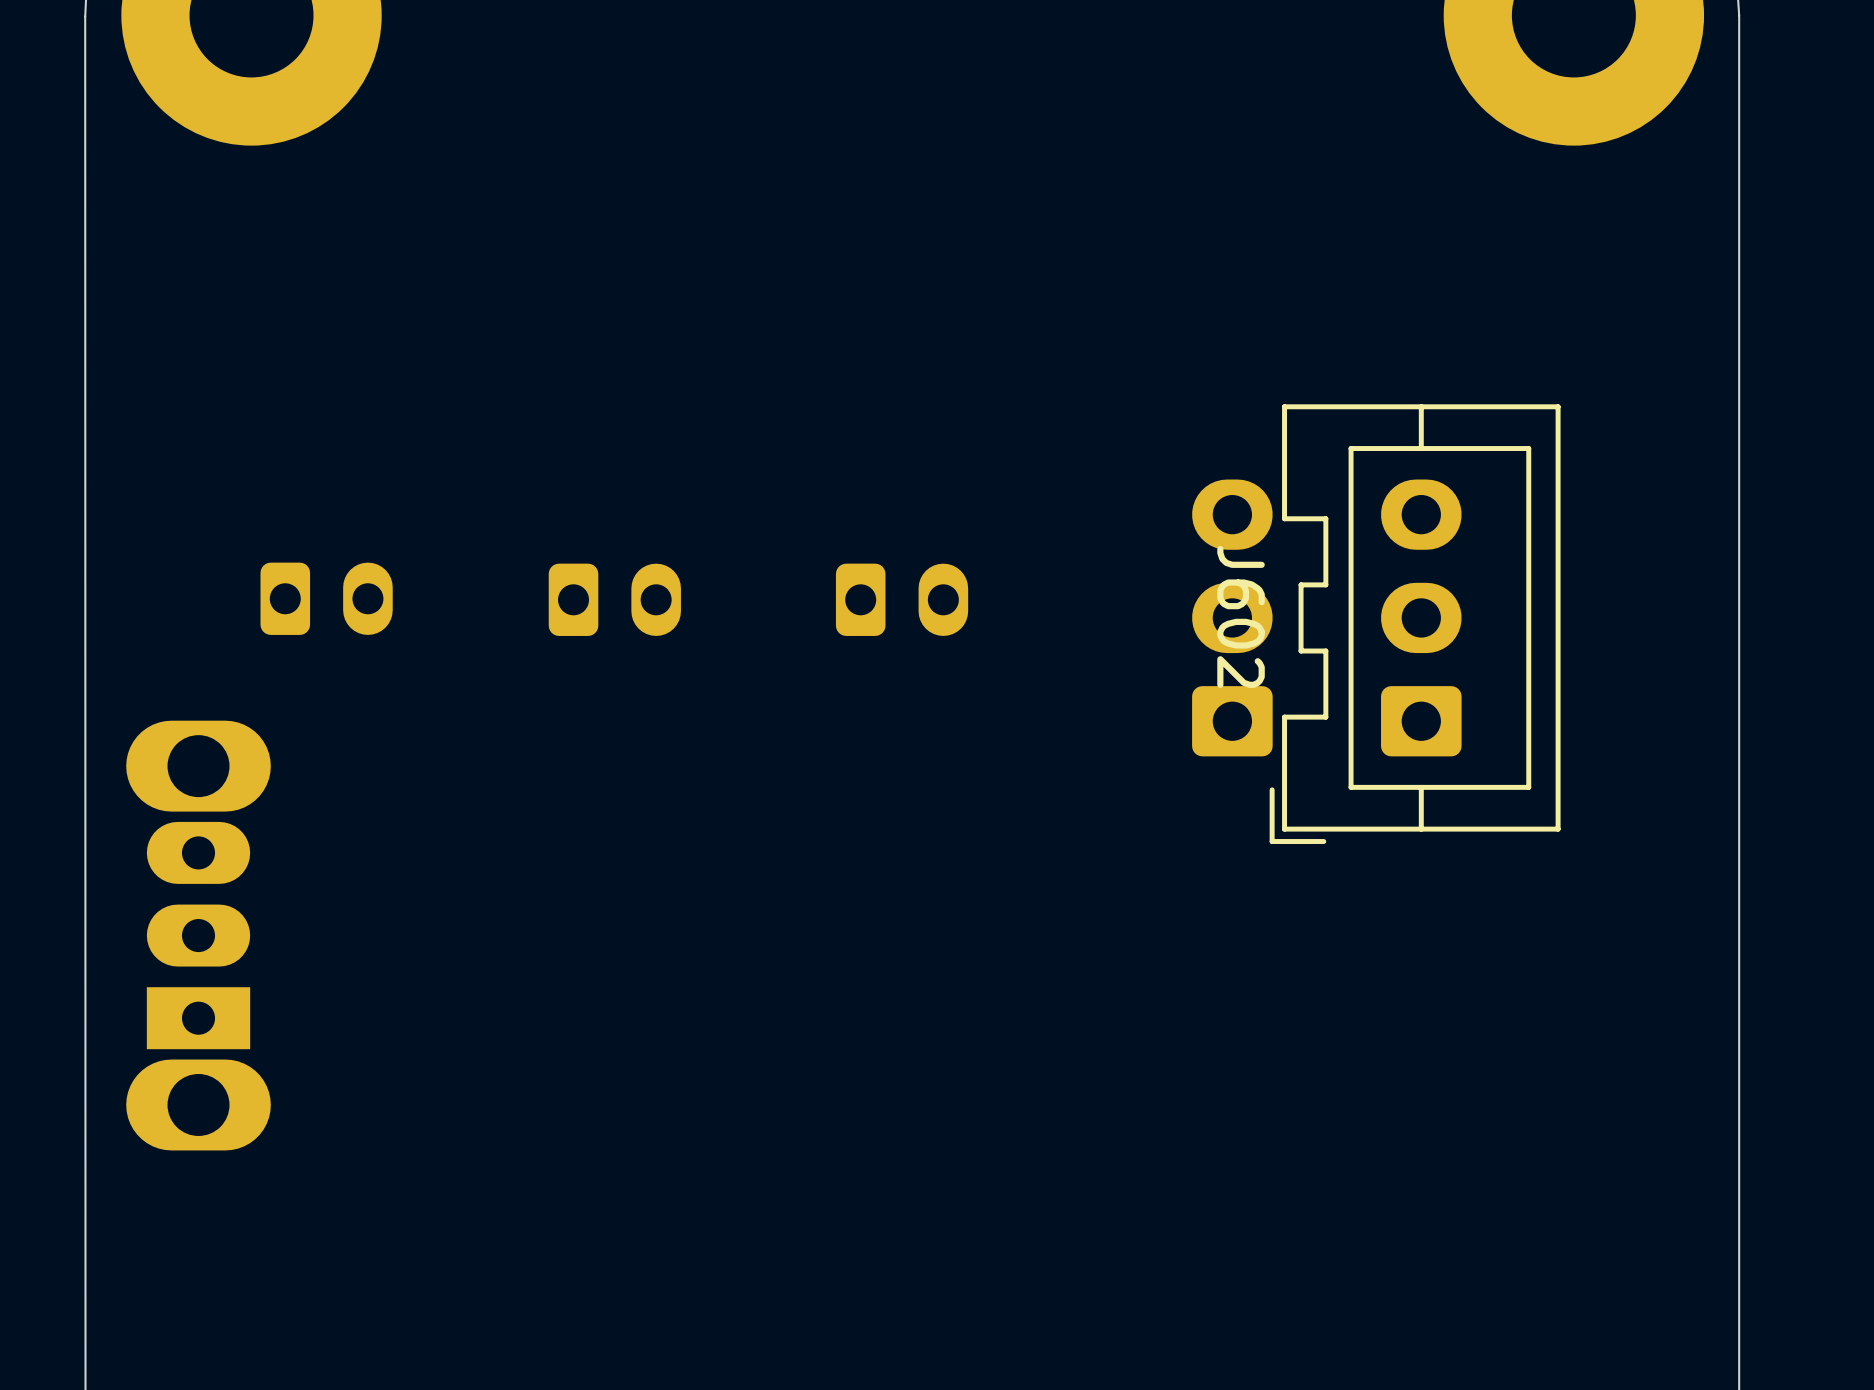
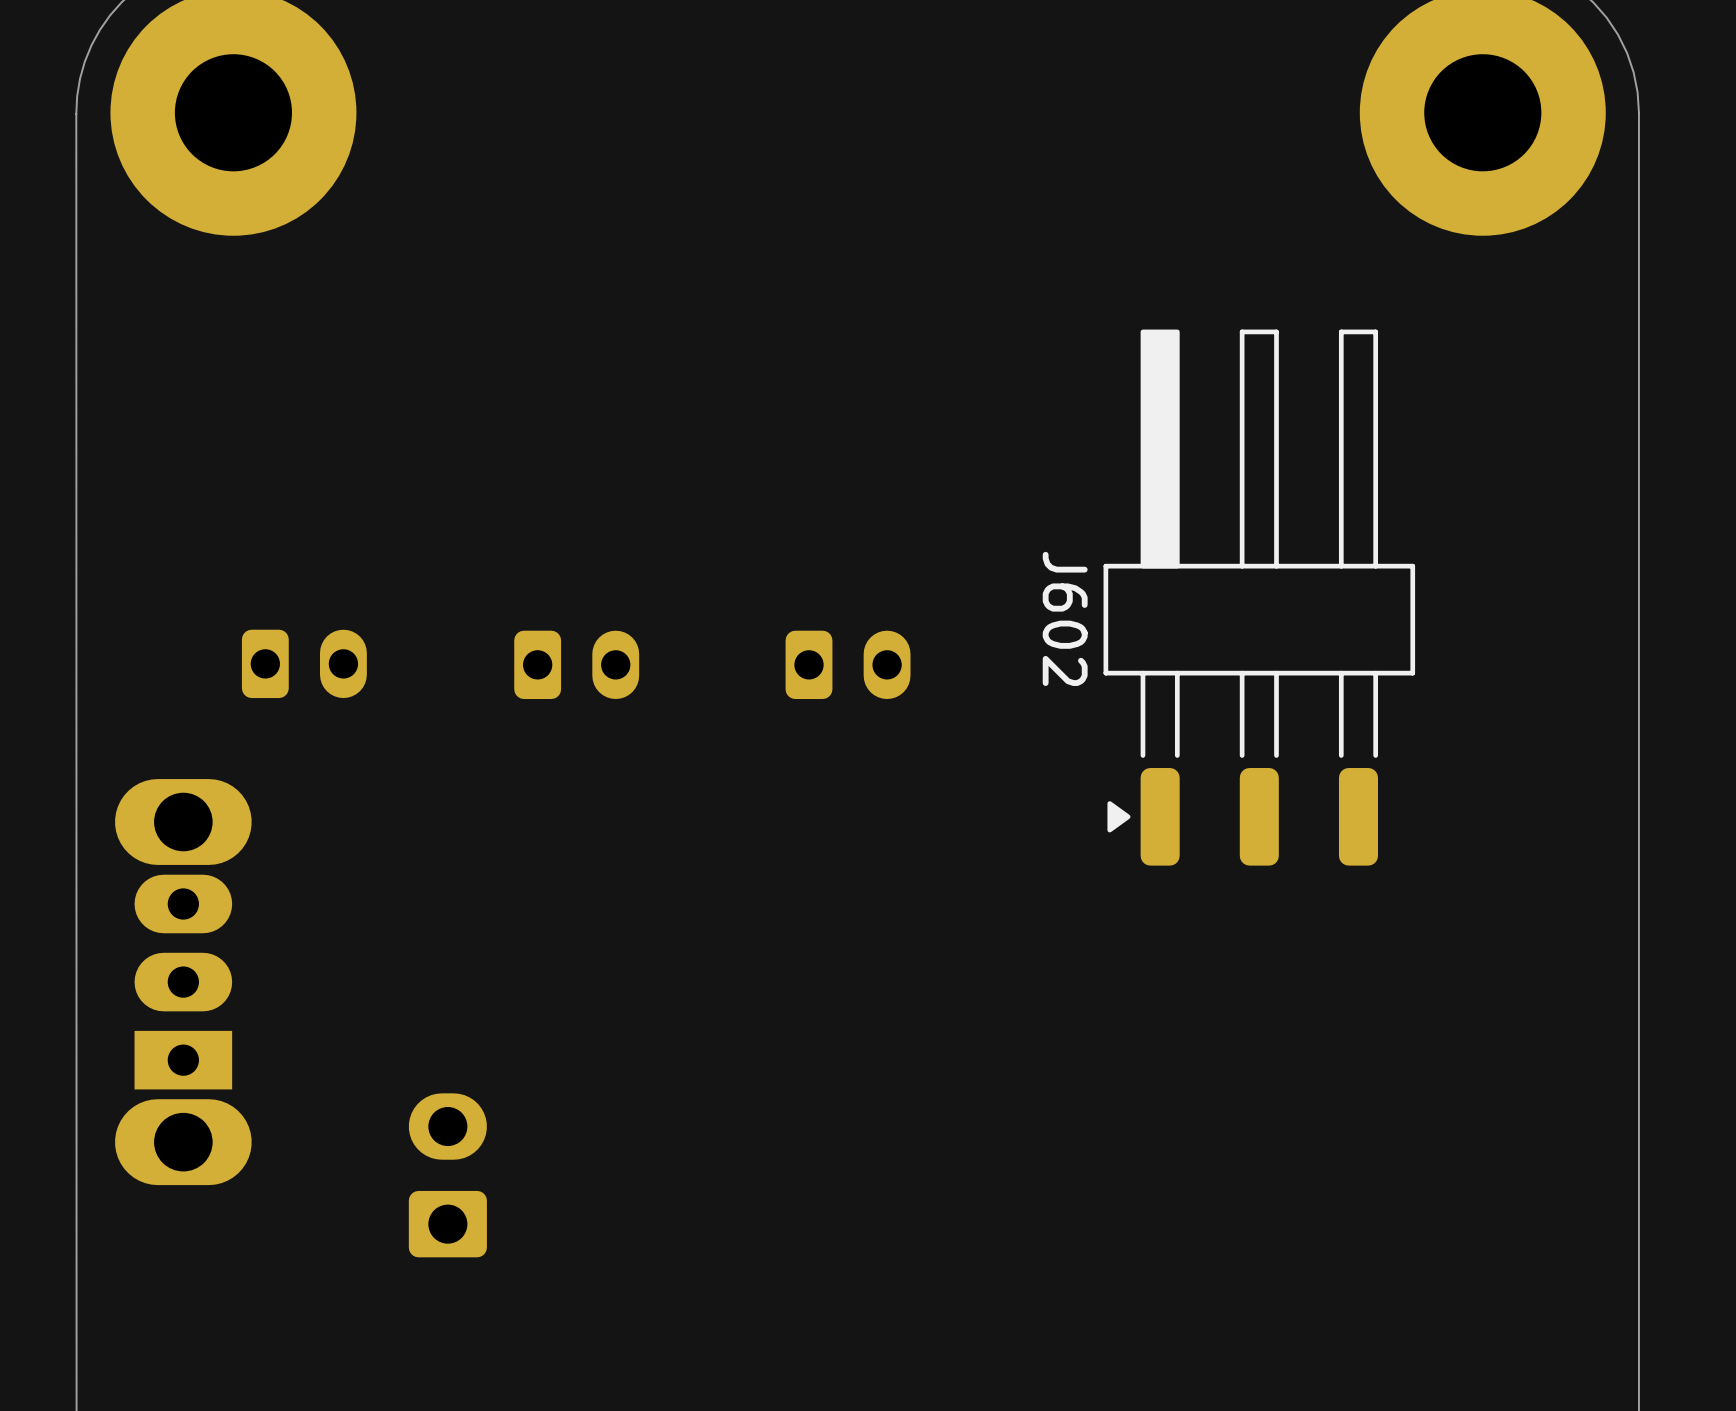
J602 footprint: [1269, 404, 1561, 844] -> [1103, 329, 1416, 866]
part: (1232, 617) -> none
part: none -> (447, 1175)

